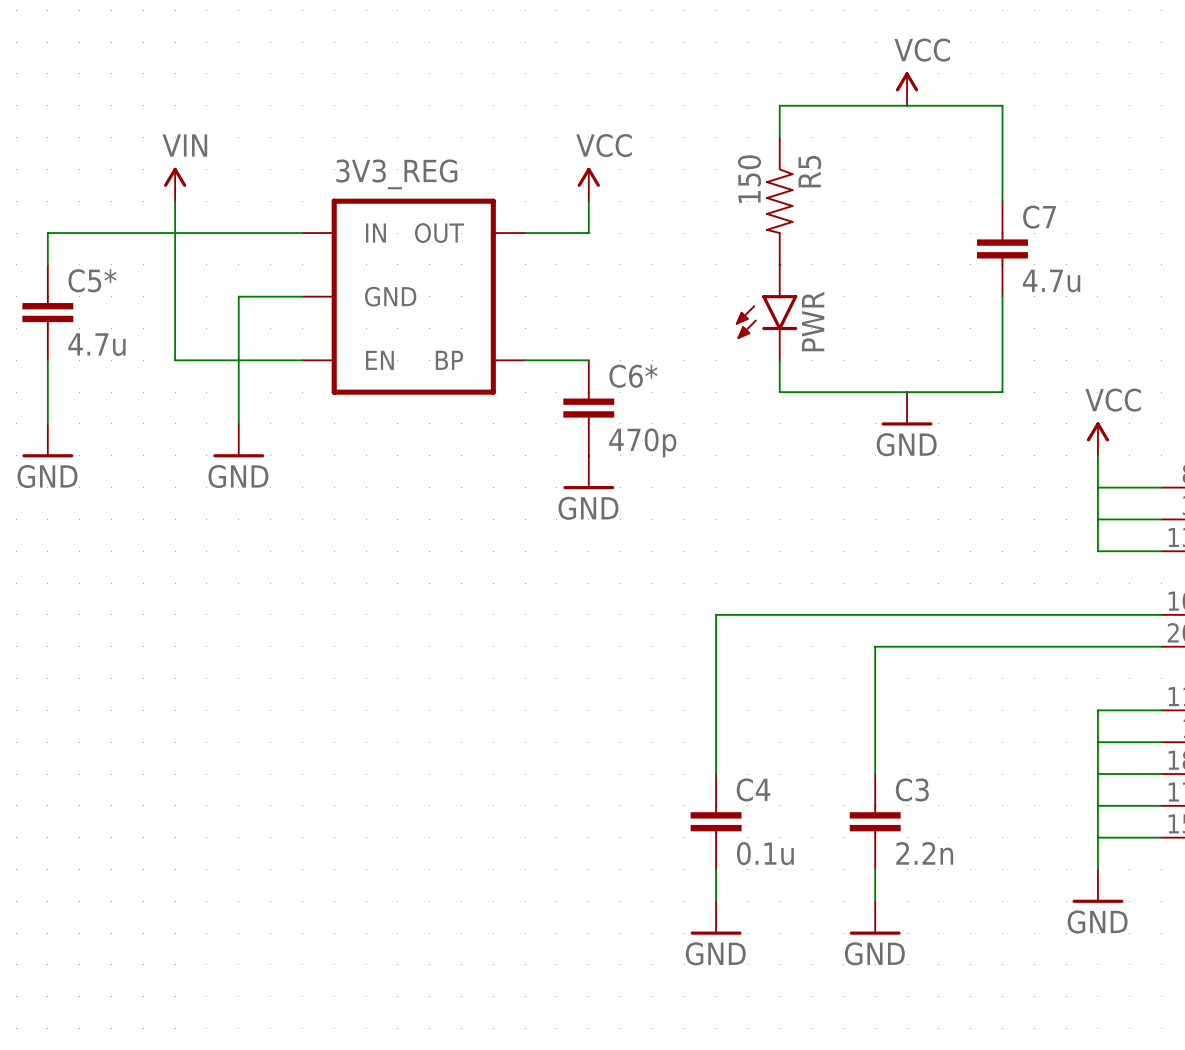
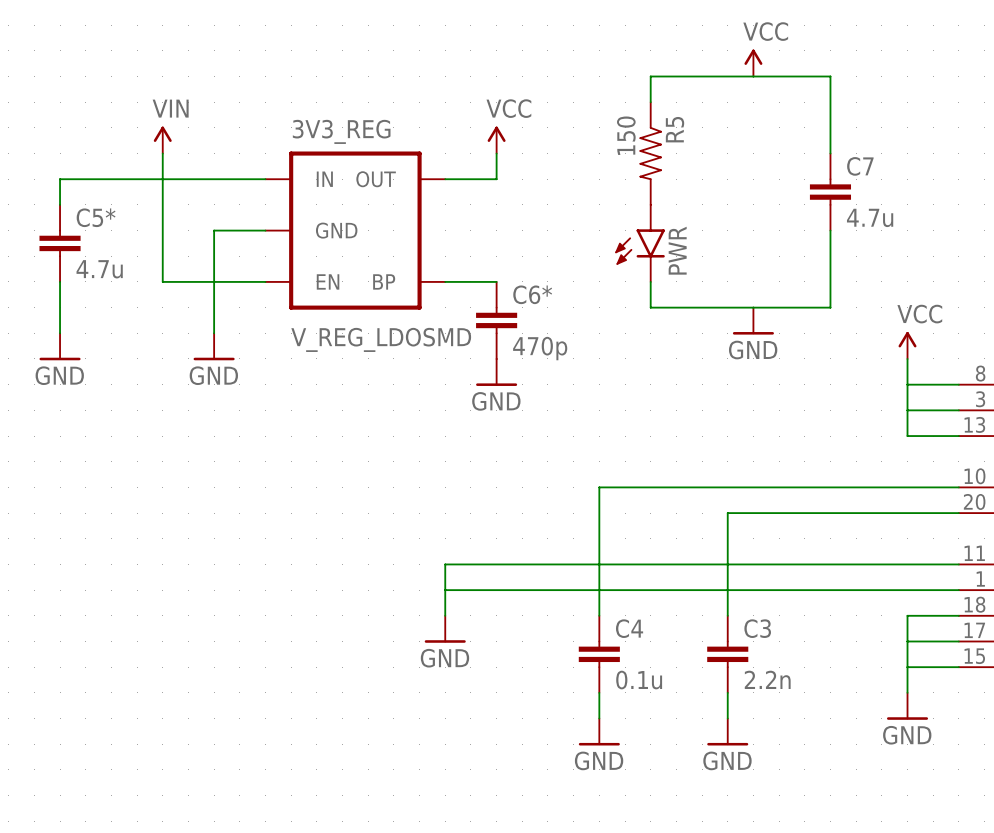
3V3_REG value: none -> V_REG_LDOSMD (381, 339)
wire: (1097, 710) (1097, 774) -> (907, 564) (445, 564) (445, 615)
wire: none -> (445, 590) (907, 590)
power symbol: none -> GND (445, 629)

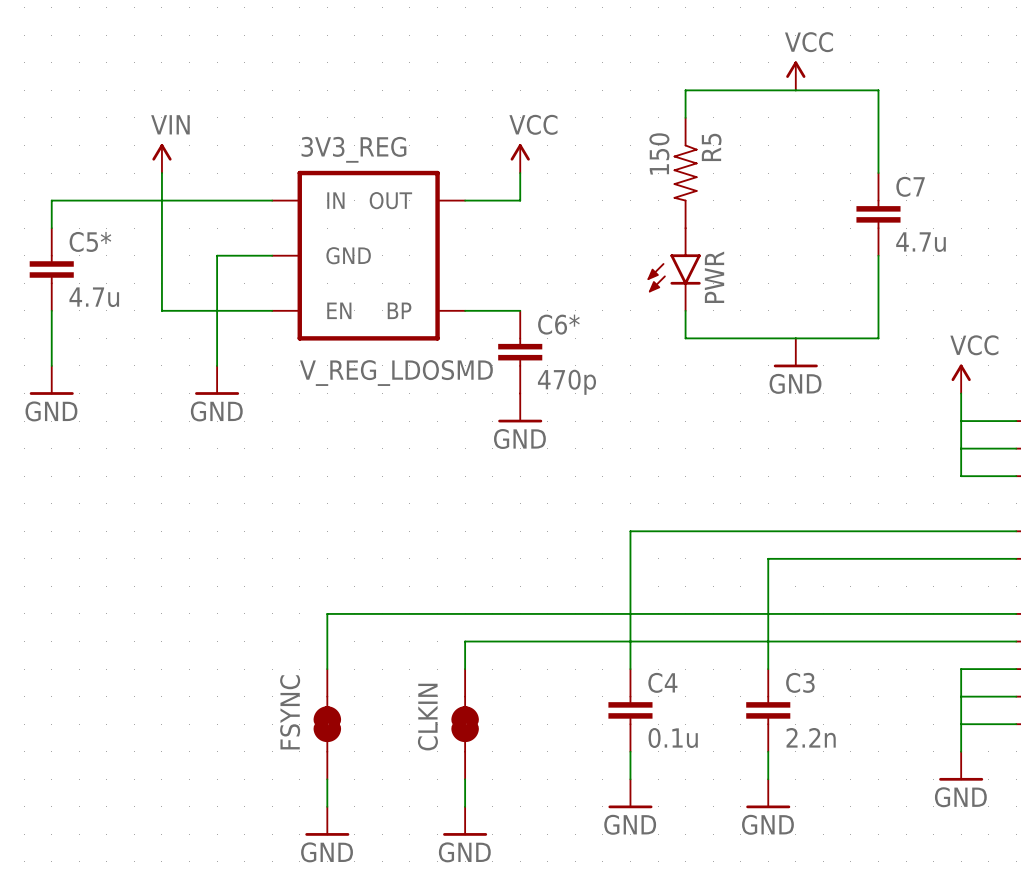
wire: (445, 564) (445, 590) -> (465, 613) (327, 613) (327, 669)
power symbol: GND (445, 629) -> none
FSYNC: none -> (327, 724)
CLKIN: none -> (465, 724)
wire: none -> (327, 779) (327, 806)
wire: none -> (465, 779) (465, 806)
power symbol: none -> GND (327, 821)
power symbol: none -> GND (465, 821)

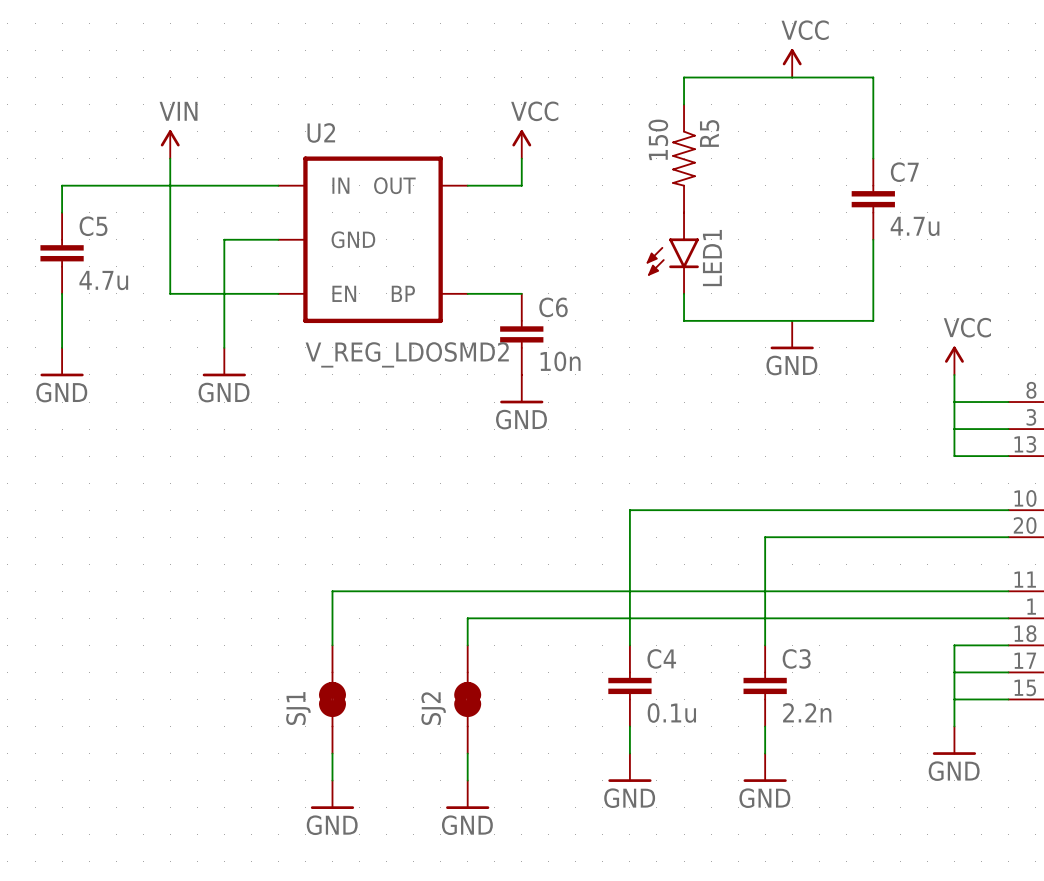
3V3_REG name: 3V3_REG (353, 149) -> U2 (321, 132)
C5* name: C5* (90, 241) -> C5 (93, 226)
PWR name: PWR (714, 277) -> LED1 (712, 258)
C6* name: C6* (558, 324) -> C6 (553, 307)
3V3_REG value: V_REG_LDOSMD (396, 373) -> V_REG_LDOSMD2 (407, 354)
C6* value: 470p (566, 382) -> 10n (560, 361)
FSYNC name: FSYNC (290, 712) -> SJ1 (298, 708)
CLKIN name: CLKIN (427, 717) -> SJ2 (433, 708)

